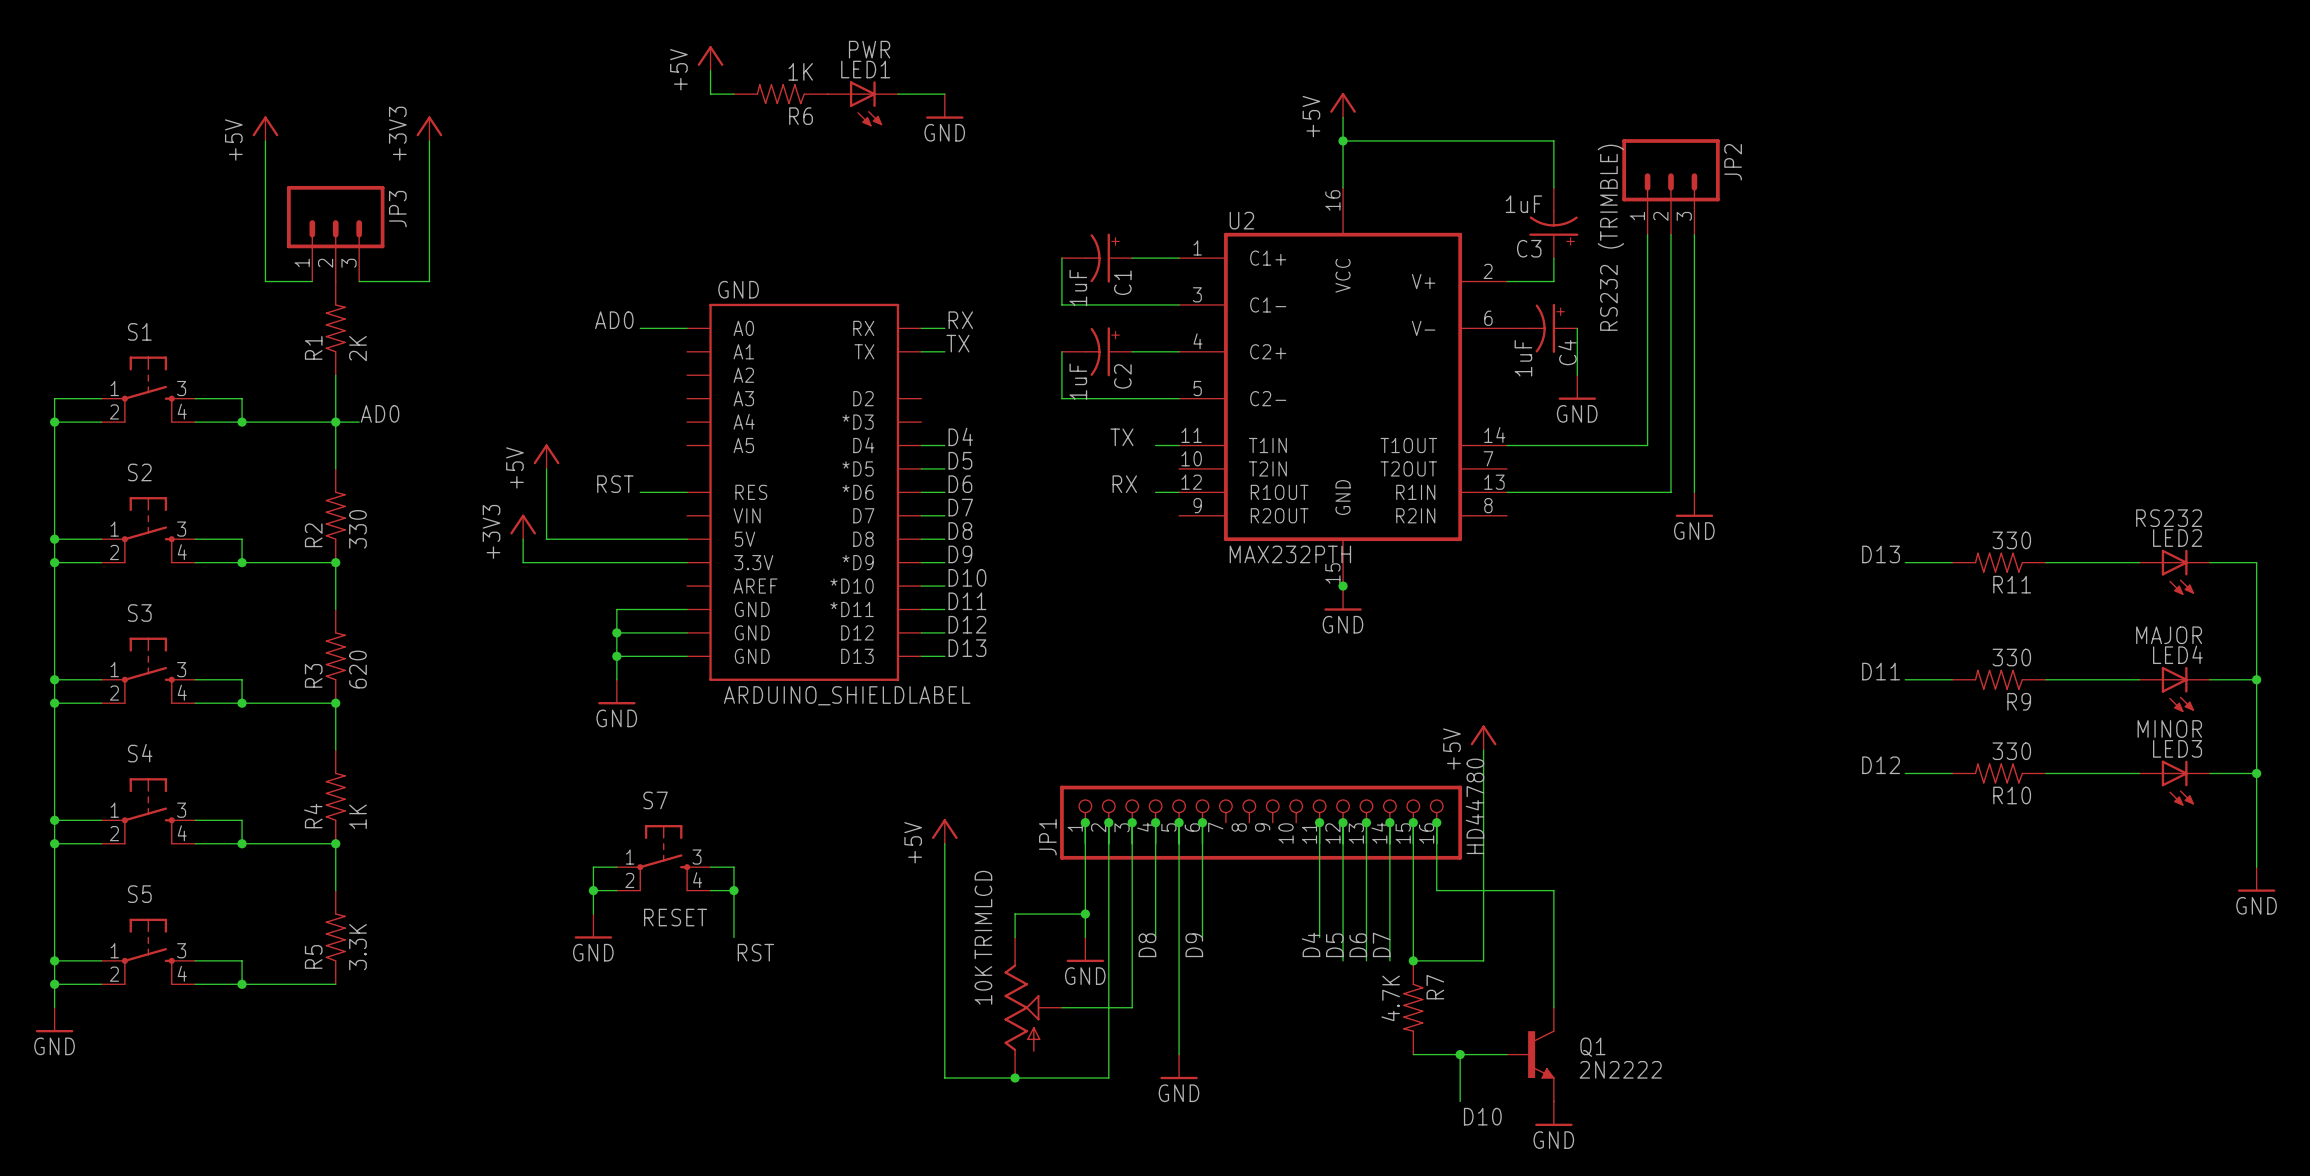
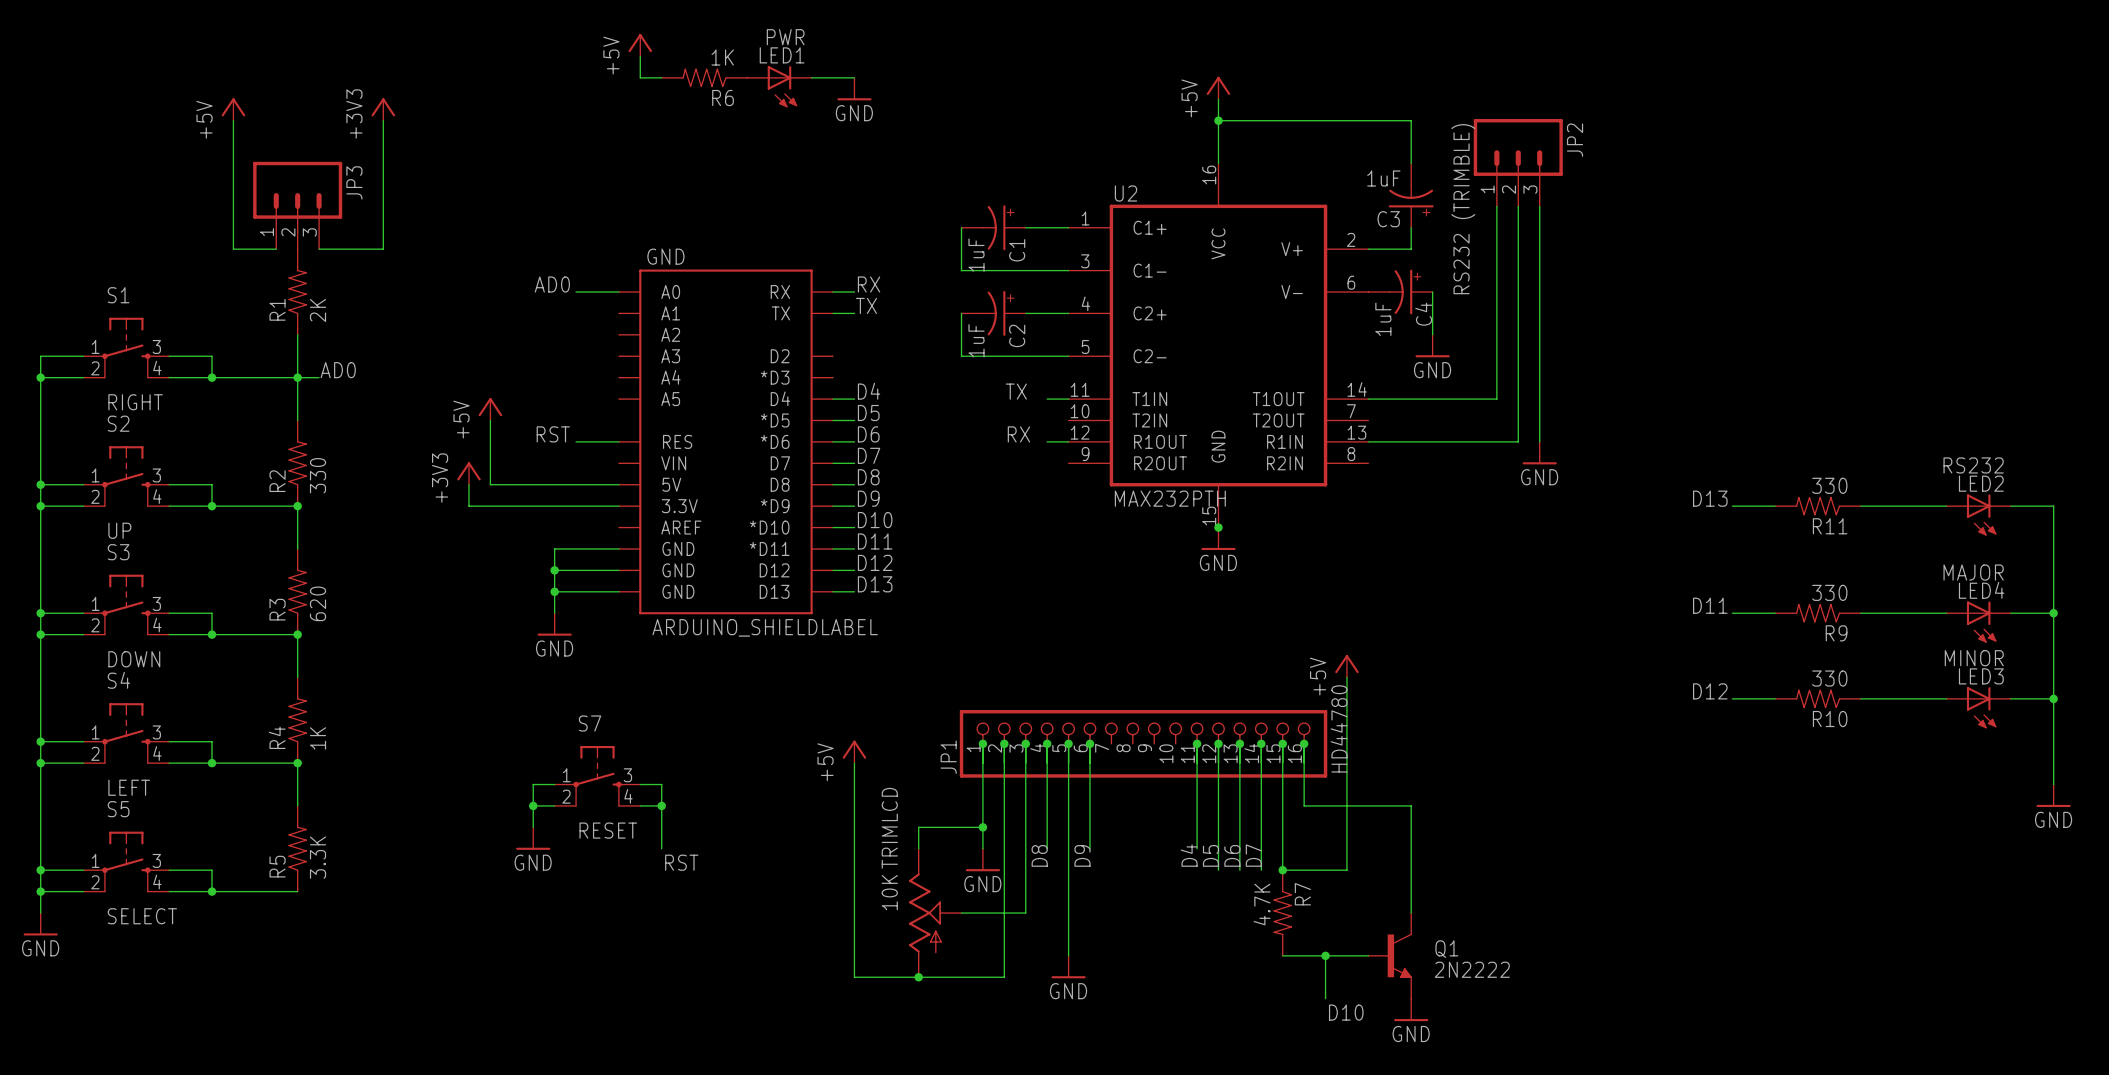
S1 value: none -> RIGHT (135, 402)
S2 value: none -> UP (119, 530)
S3 value: none -> DOWN (134, 659)
S4 value: none -> LEFT (129, 787)
S5 value: none -> SELECT (142, 916)

